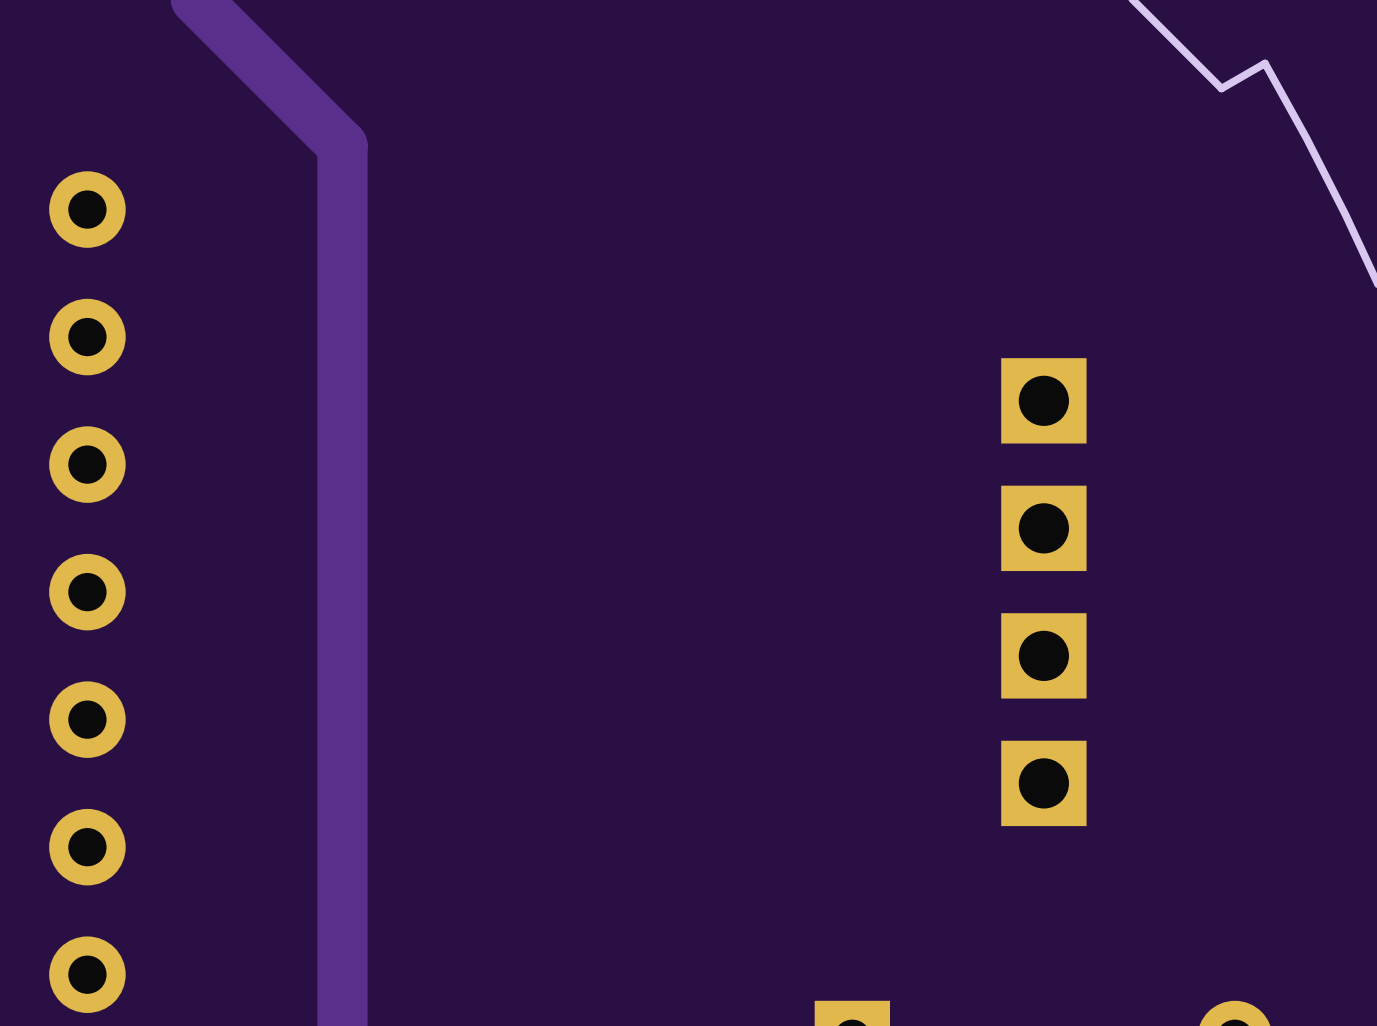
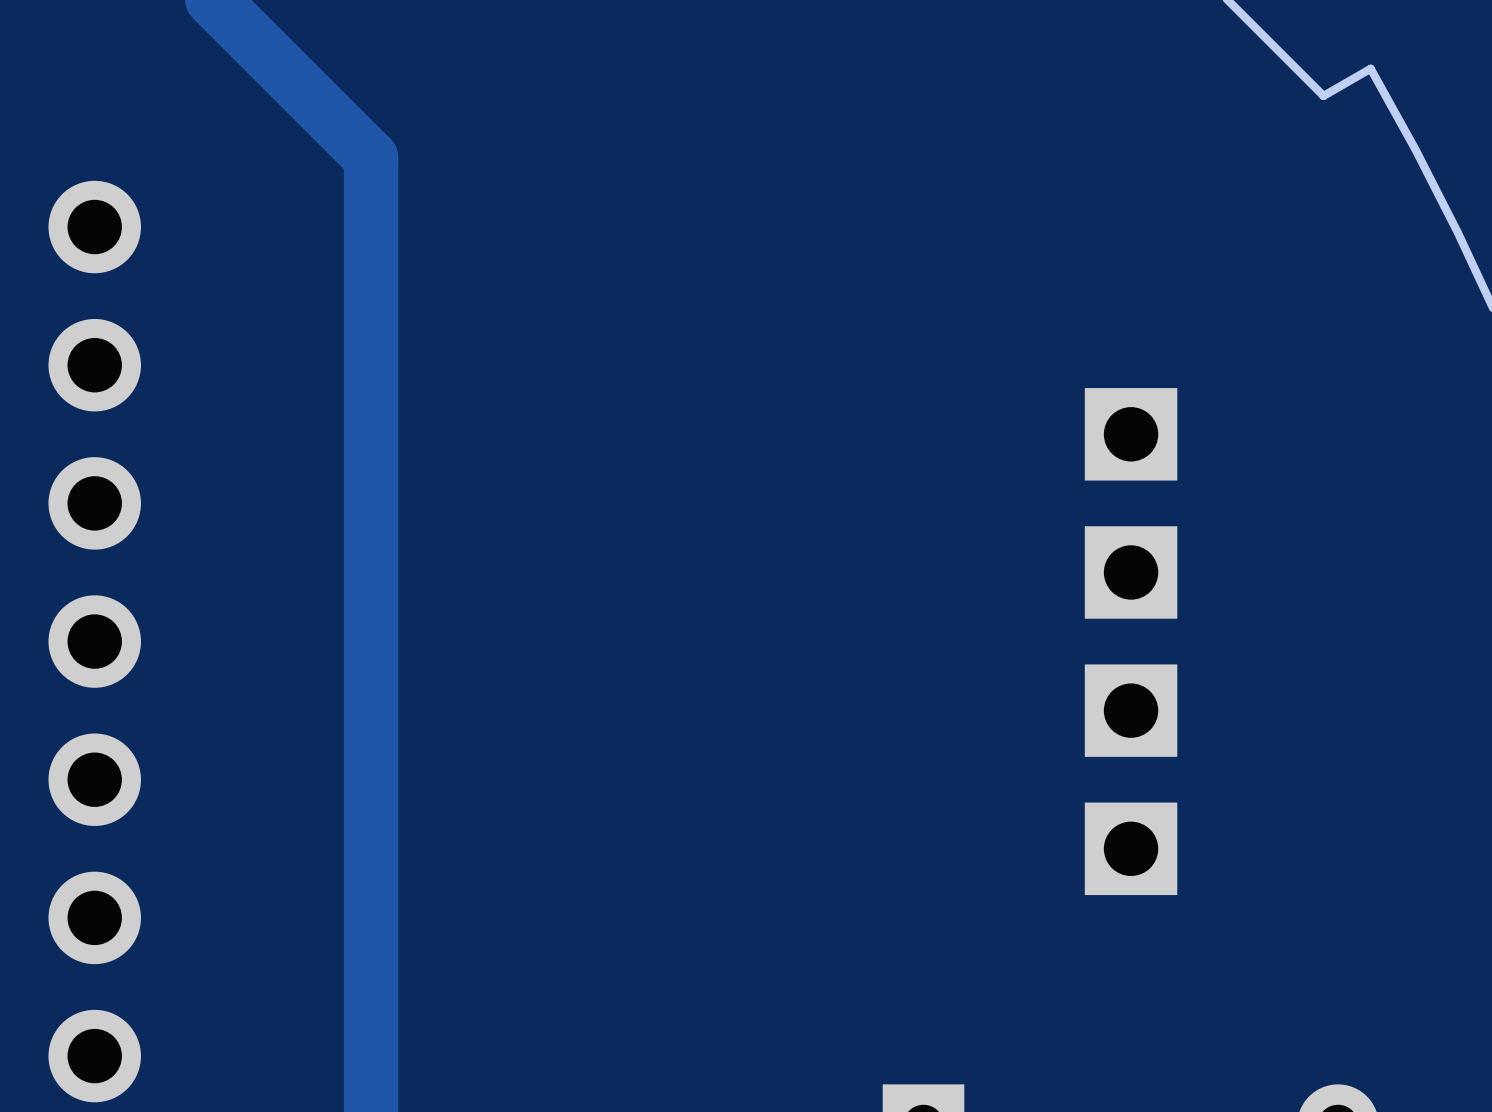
part footprint: [49, 171, 126, 1013] -> [48, 180, 141, 1103]

